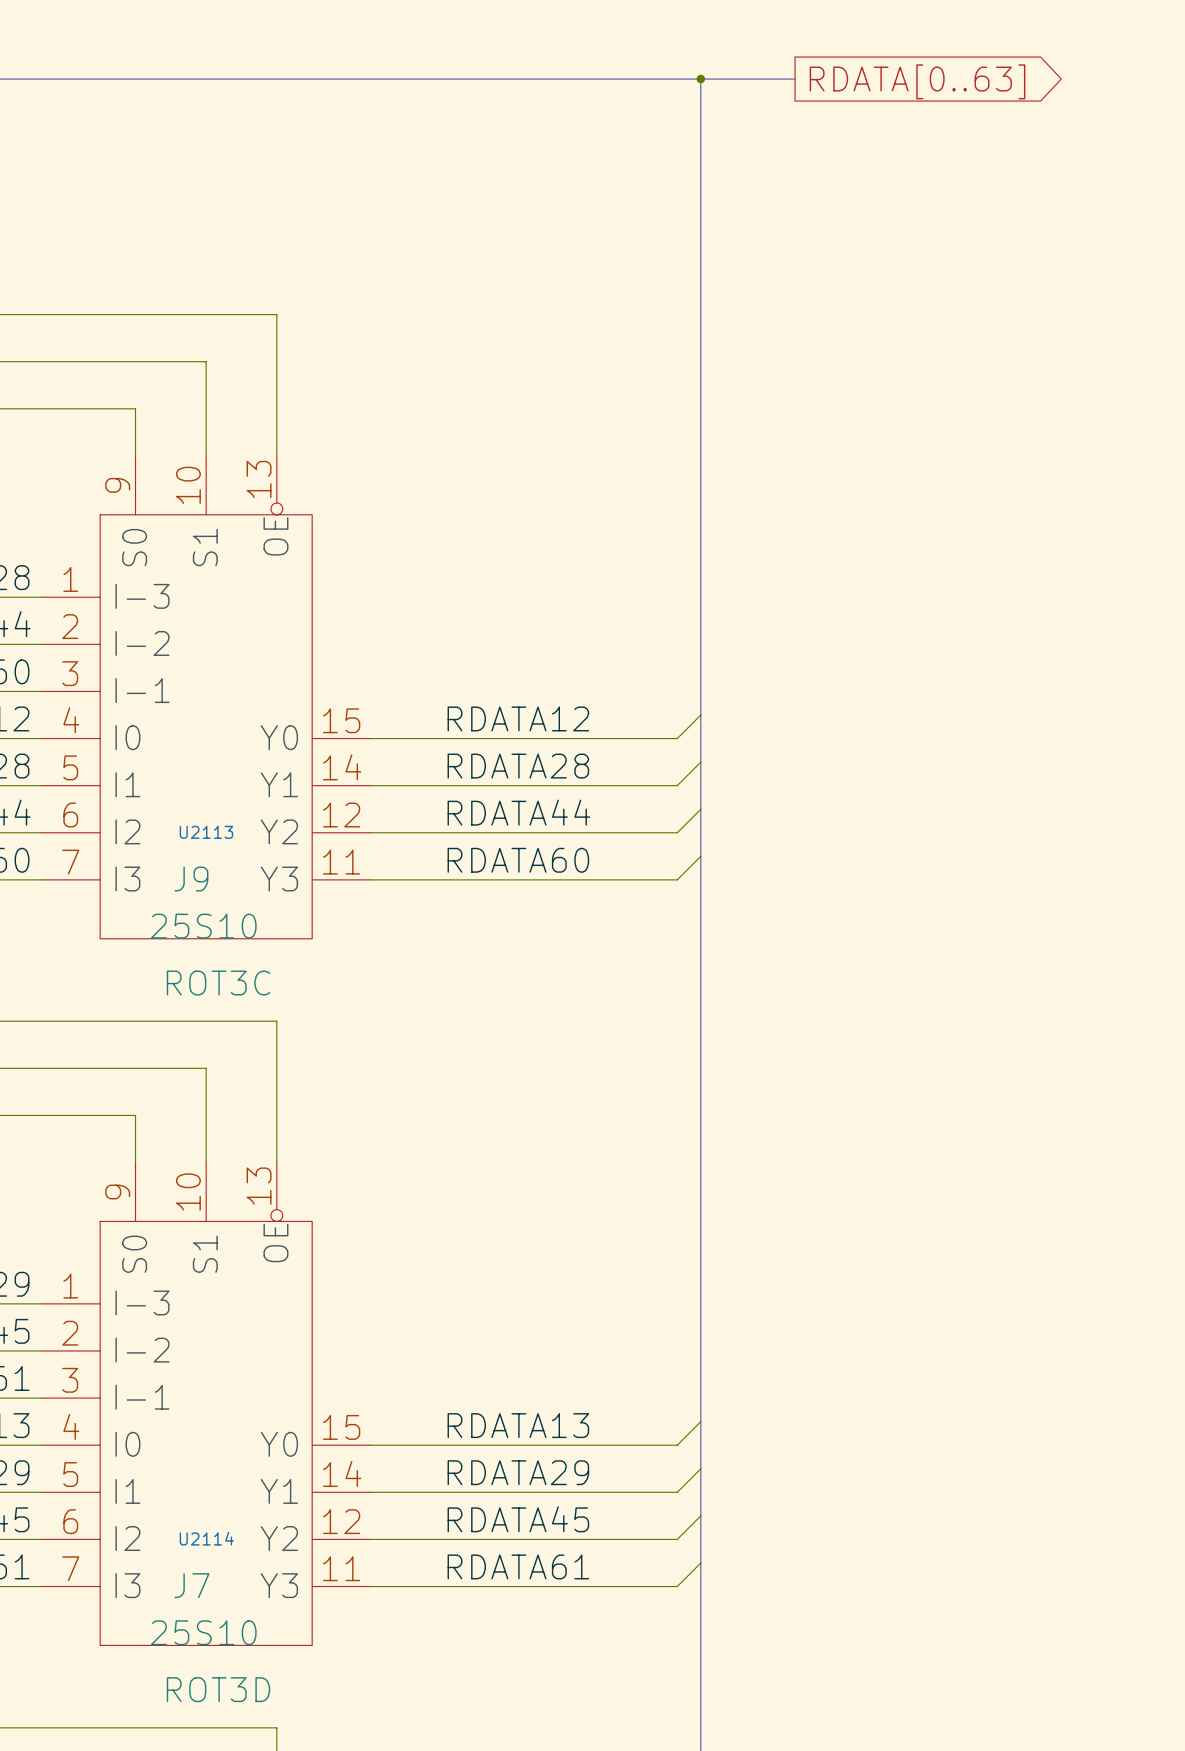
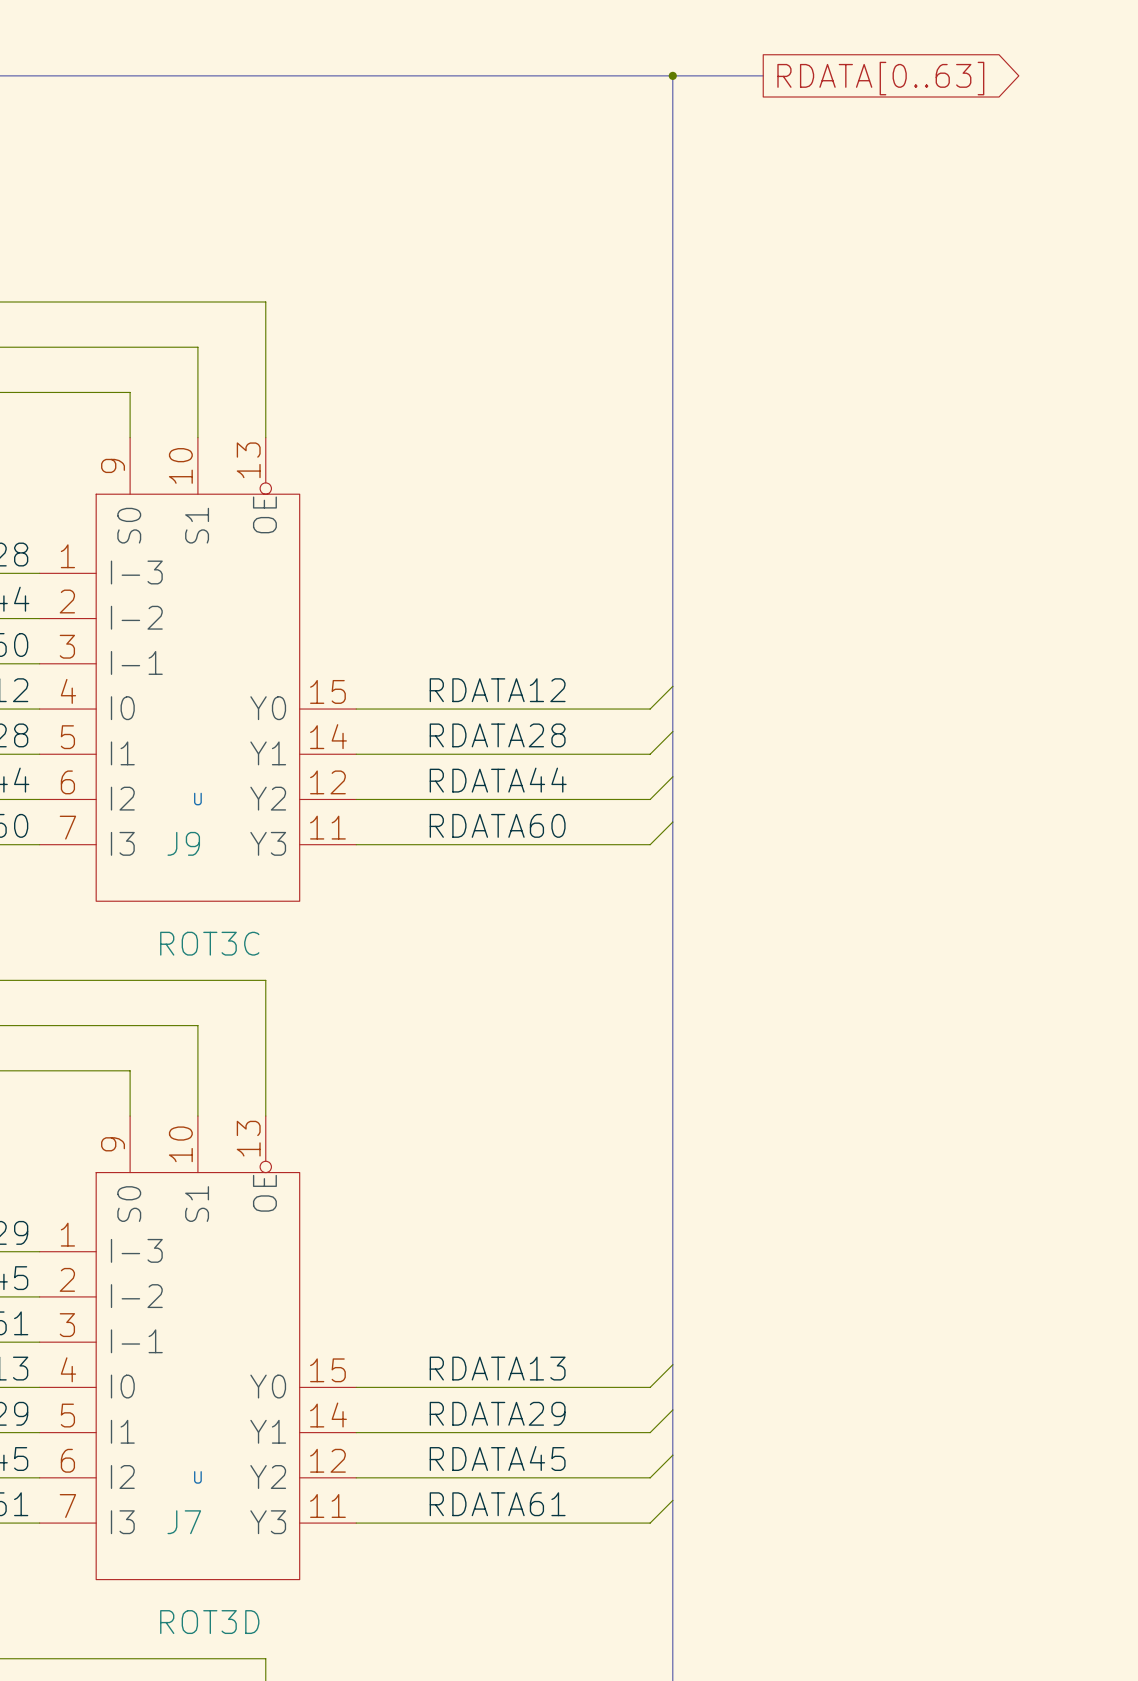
U2113 name: U2113 (206, 832) -> U (197, 799)
U2113 value: 25S10 (203, 926) -> none
U2114 name: U2114 (206, 1538) -> U (197, 1477)
U2114 value: 25S10 (203, 1632) -> none

